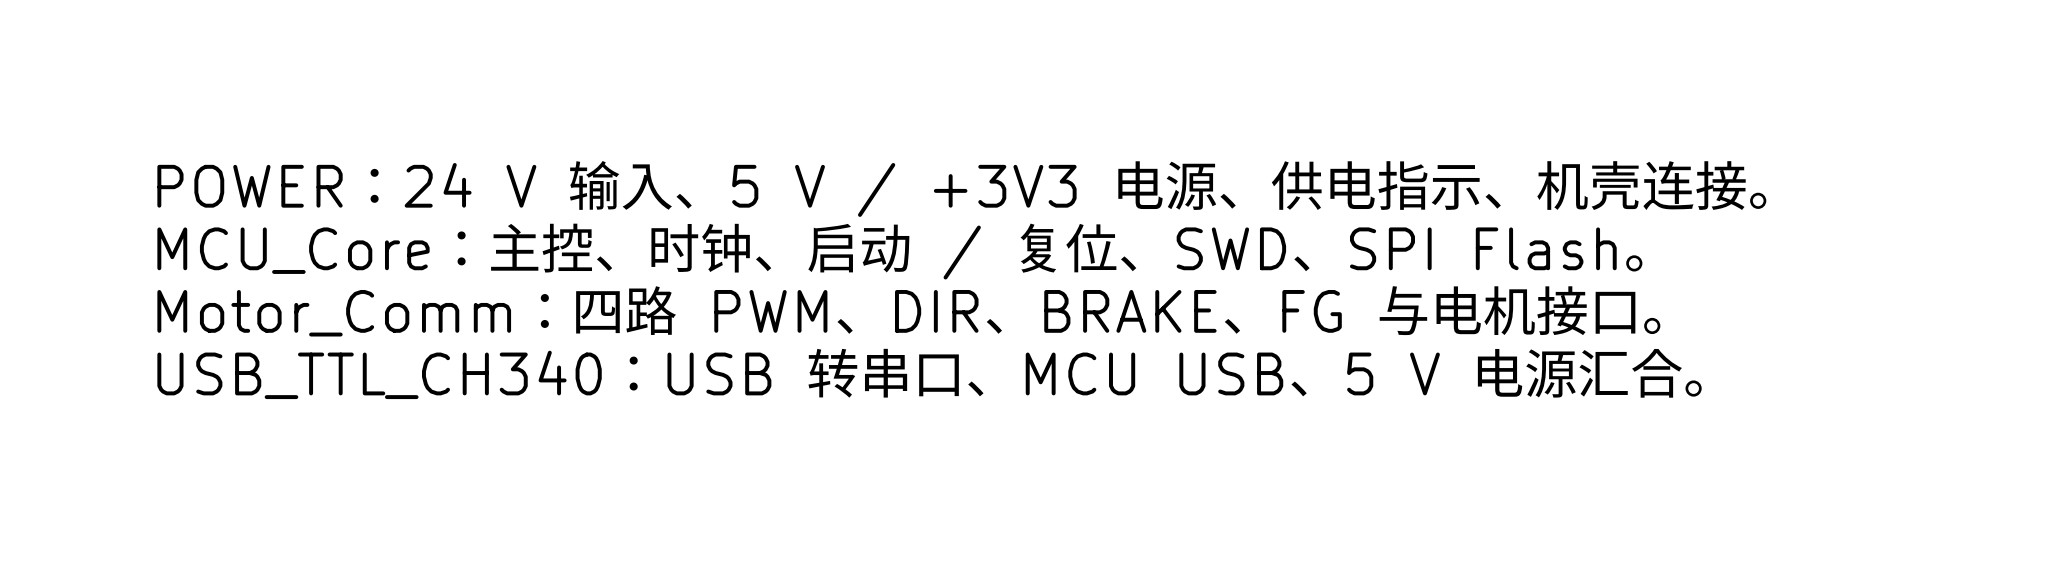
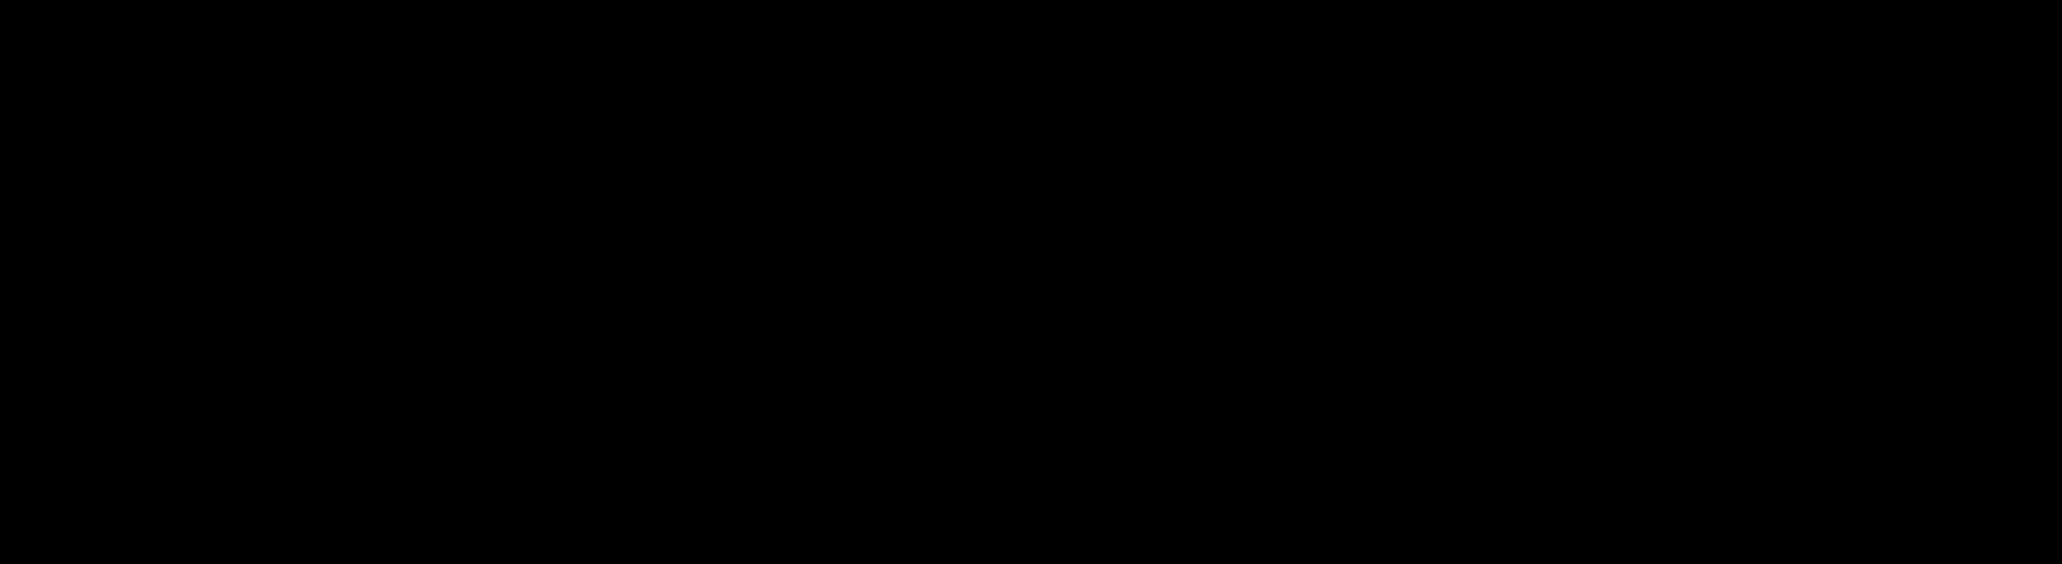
text: POWER：24 V 输入、5 V / +3V3 电源、供电指示、机壳连接。 (962, 187) -> none
text: MCU_Core：主控、时钟、启动 / 复位、SWD、SPI Flash。 (900, 250) -> none
text: Motor_Comm：四路 PWM、DIR、BRAKE、FG 与电机接口。 (909, 310) -> none
text: USB_TTL_CH340：USB 转串口、MCU USB、5 V 电源汇合。 (930, 373) -> none

